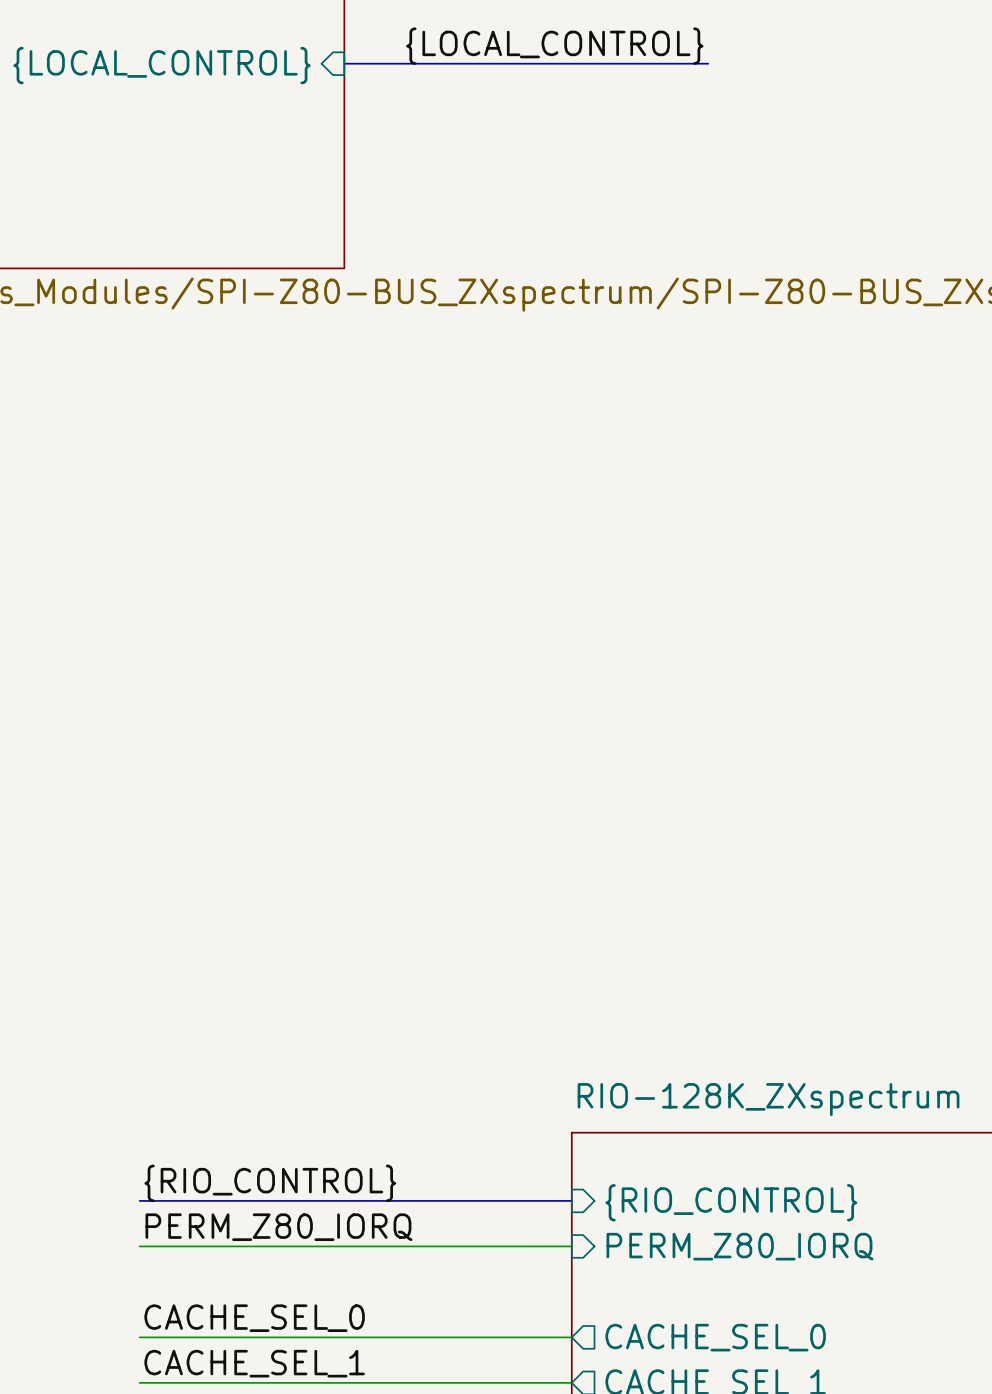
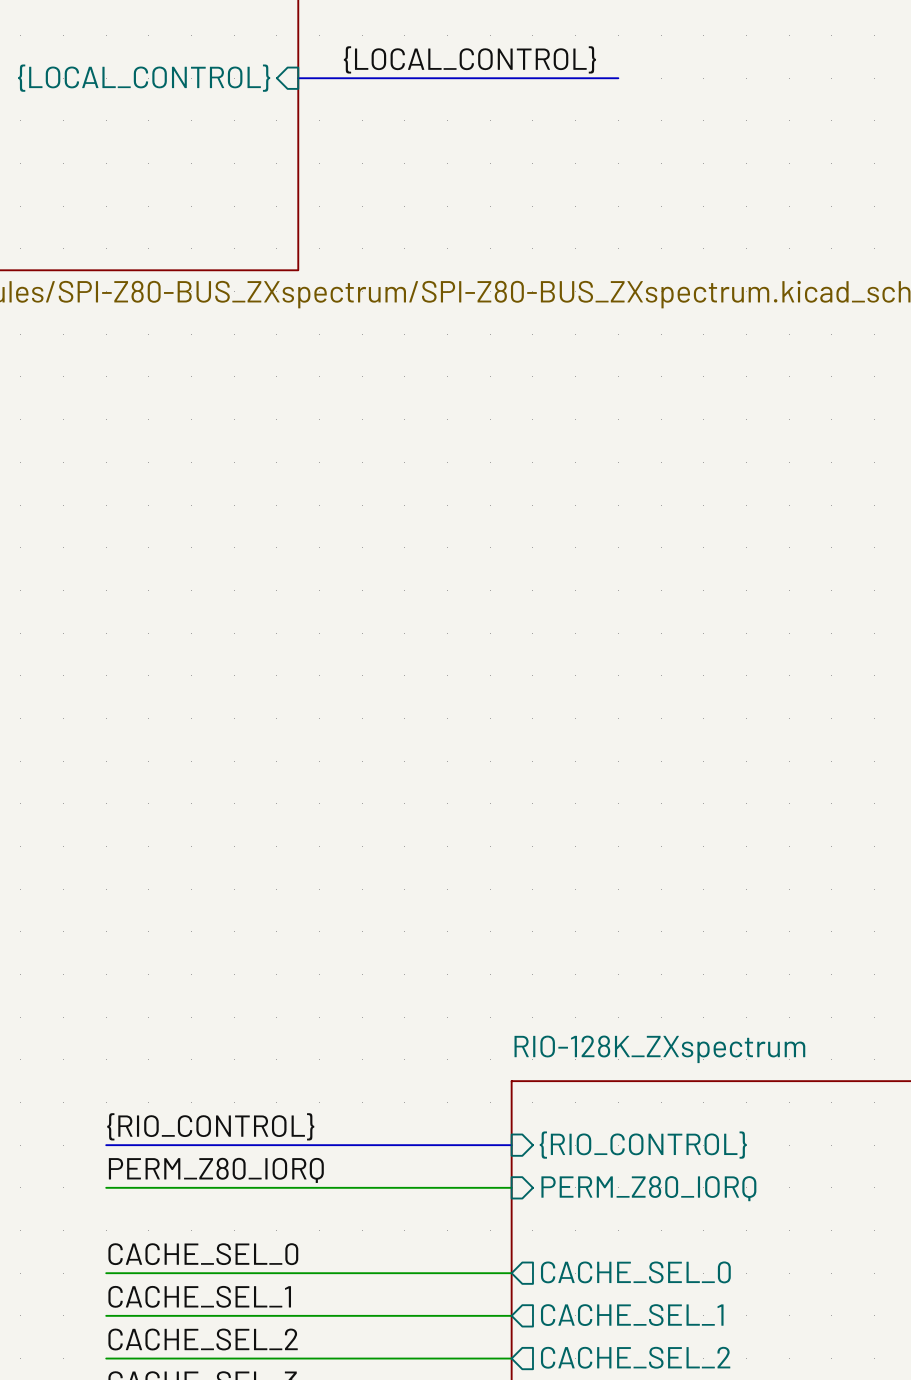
label position: {LOCAL_CONTROL} (554, 46) -> {LOCAL_CONTROL} (469, 59)
bus: (685, 63) (708, 63) -> none

